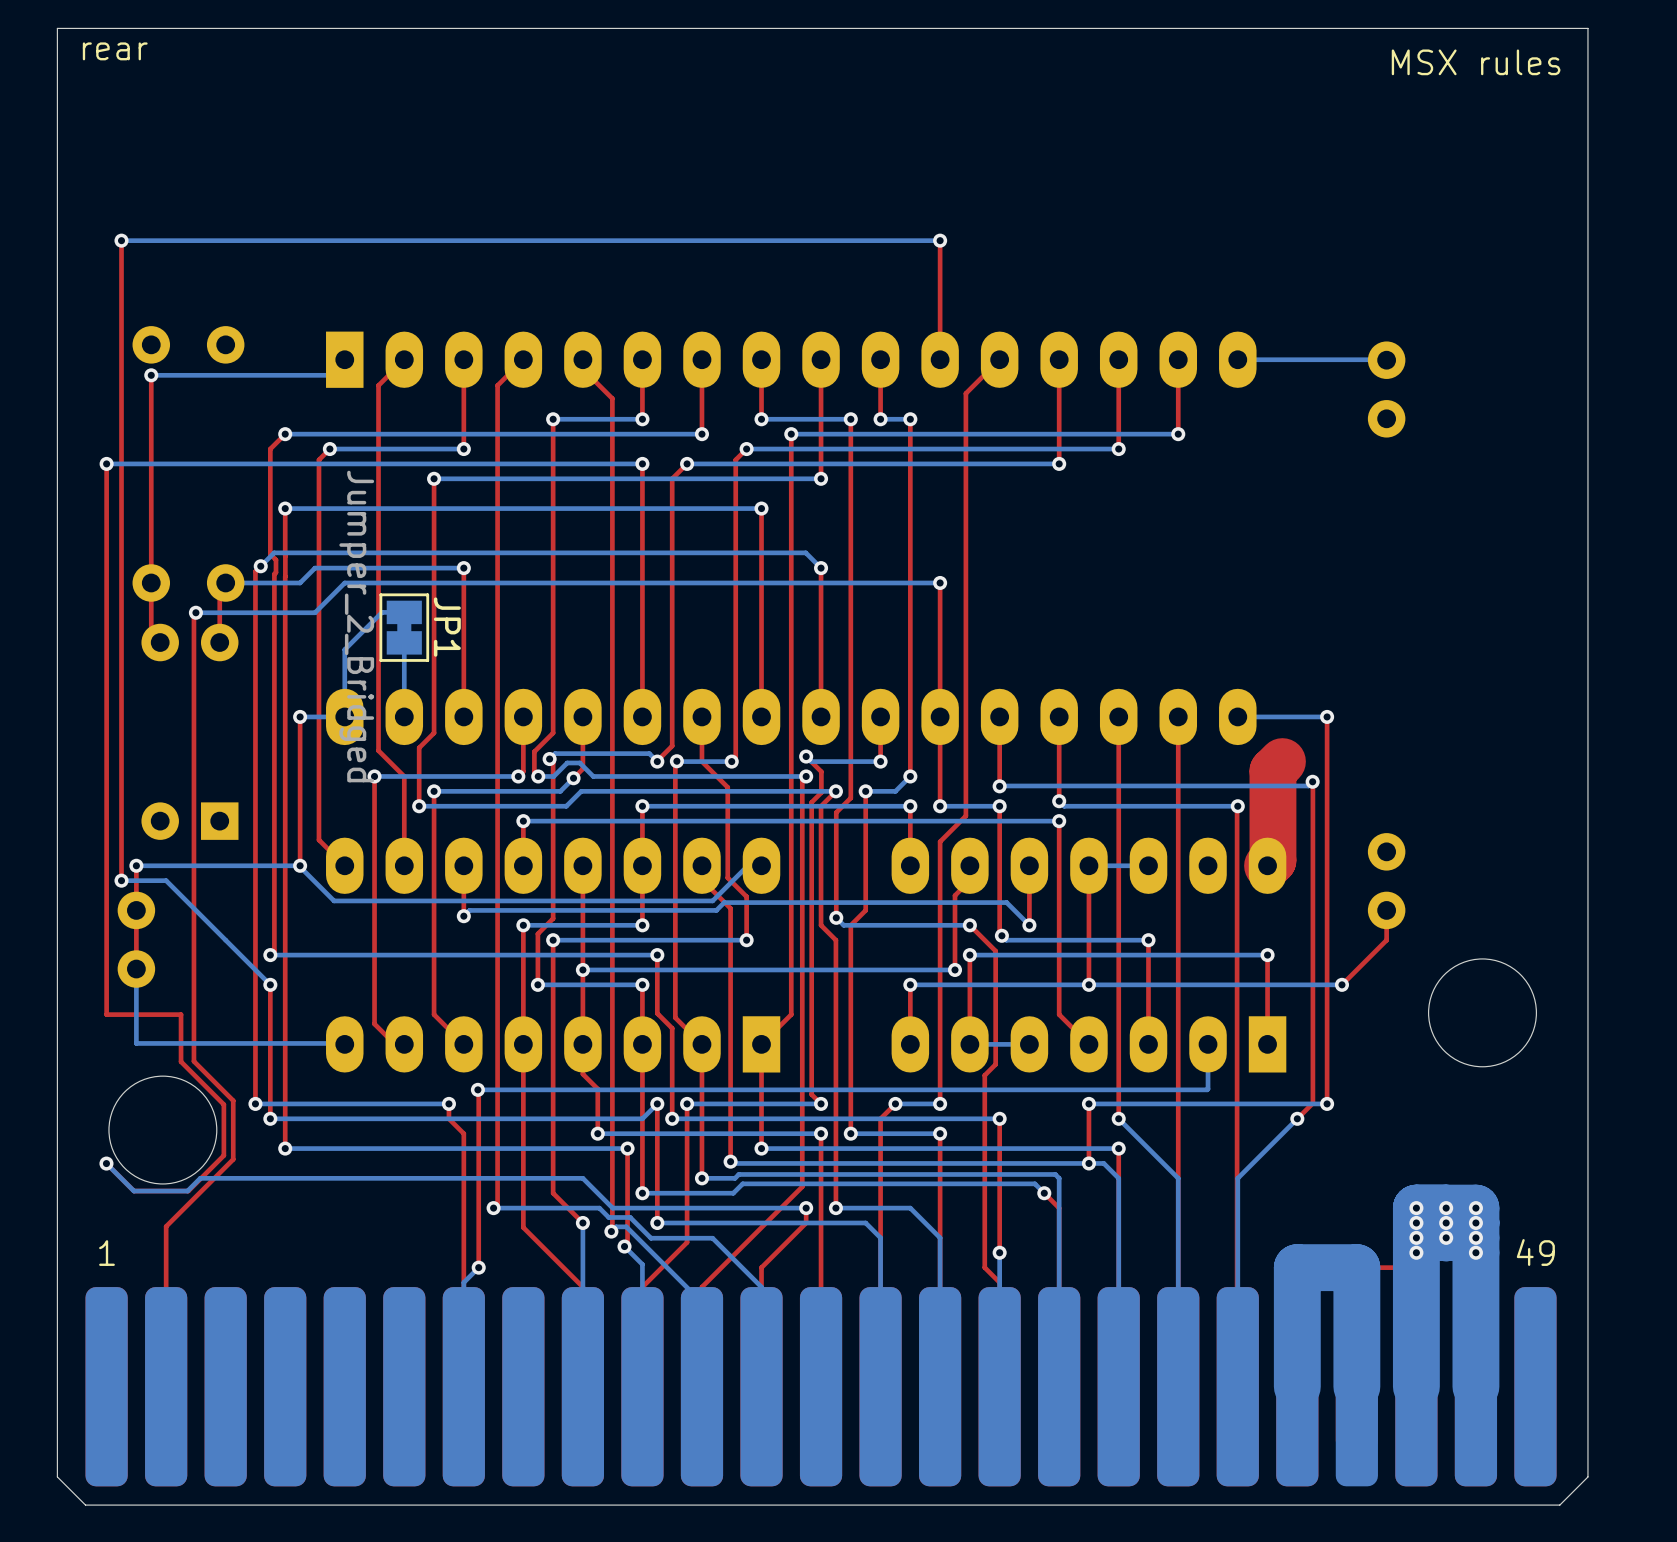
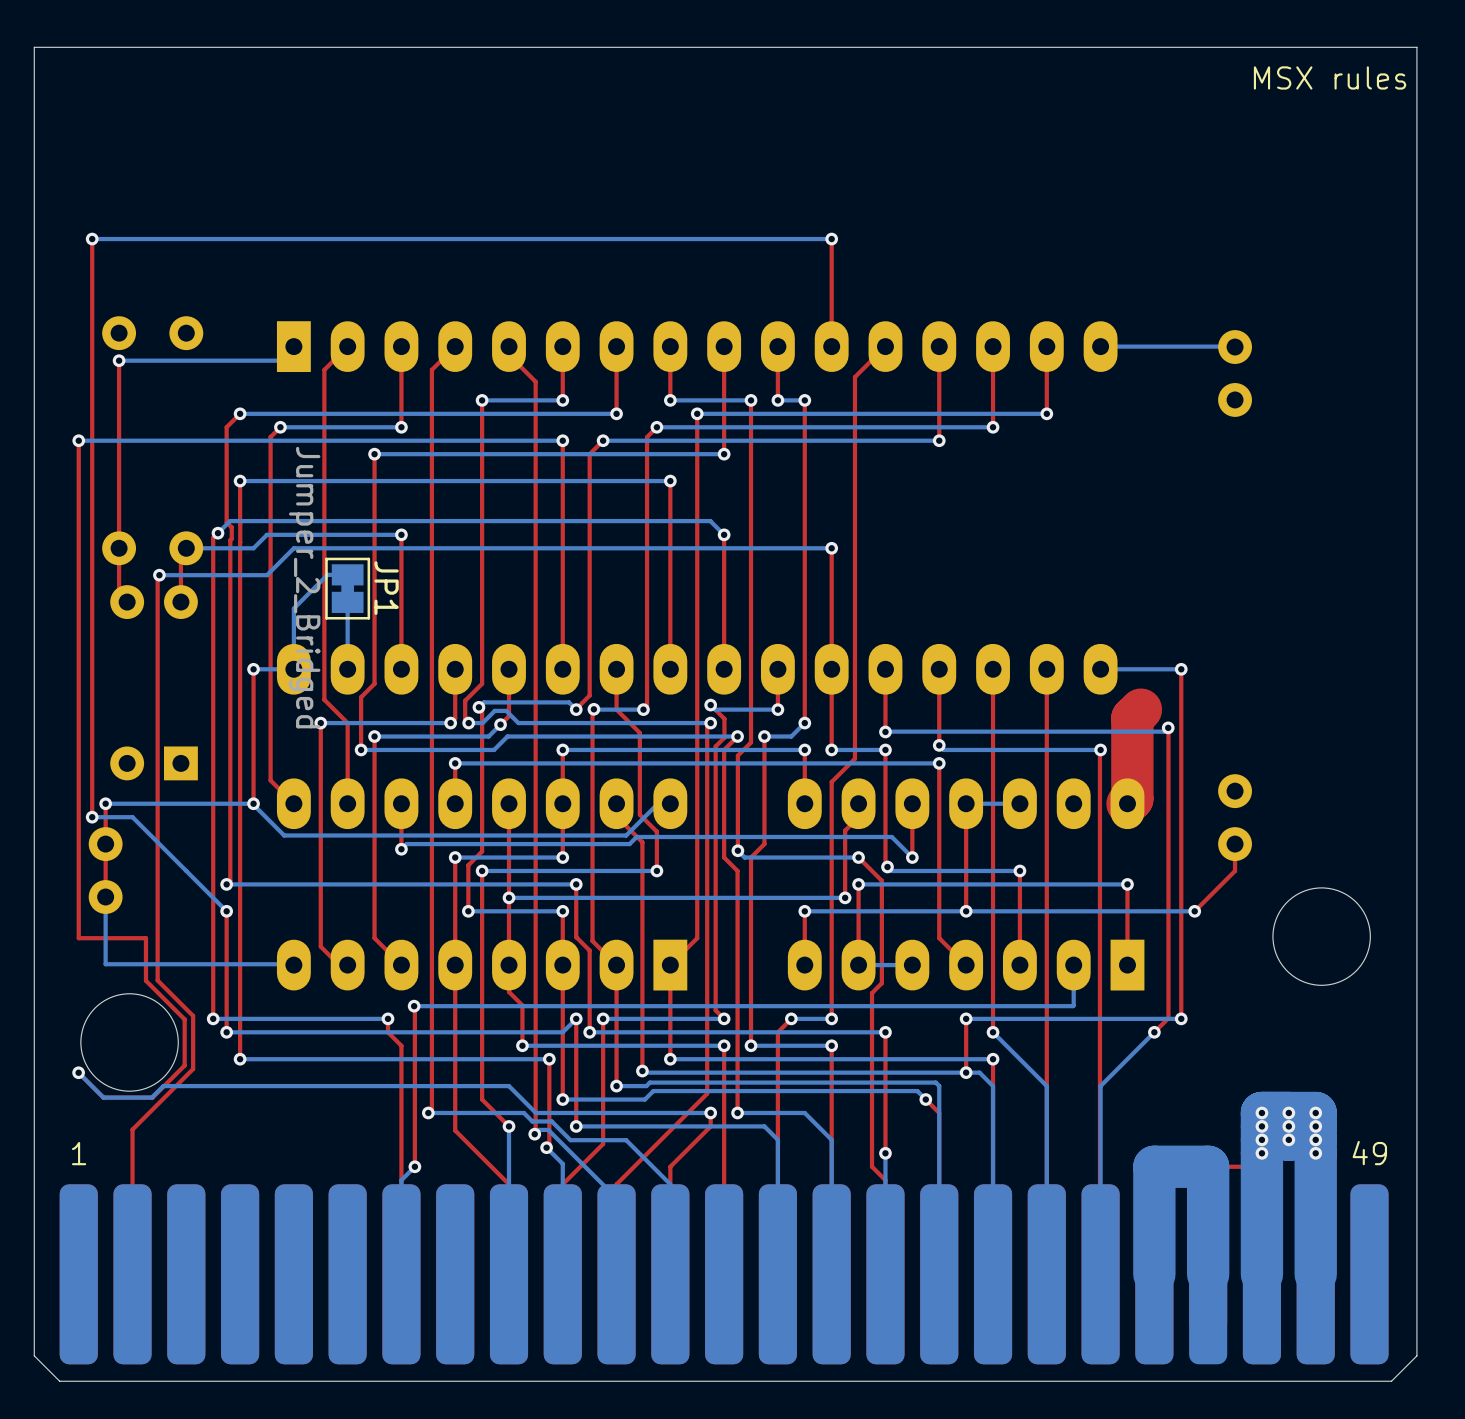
text: rear (115, 51) -> none
text position: MSX rules (1476, 62) -> MSX rules (1330, 77)

